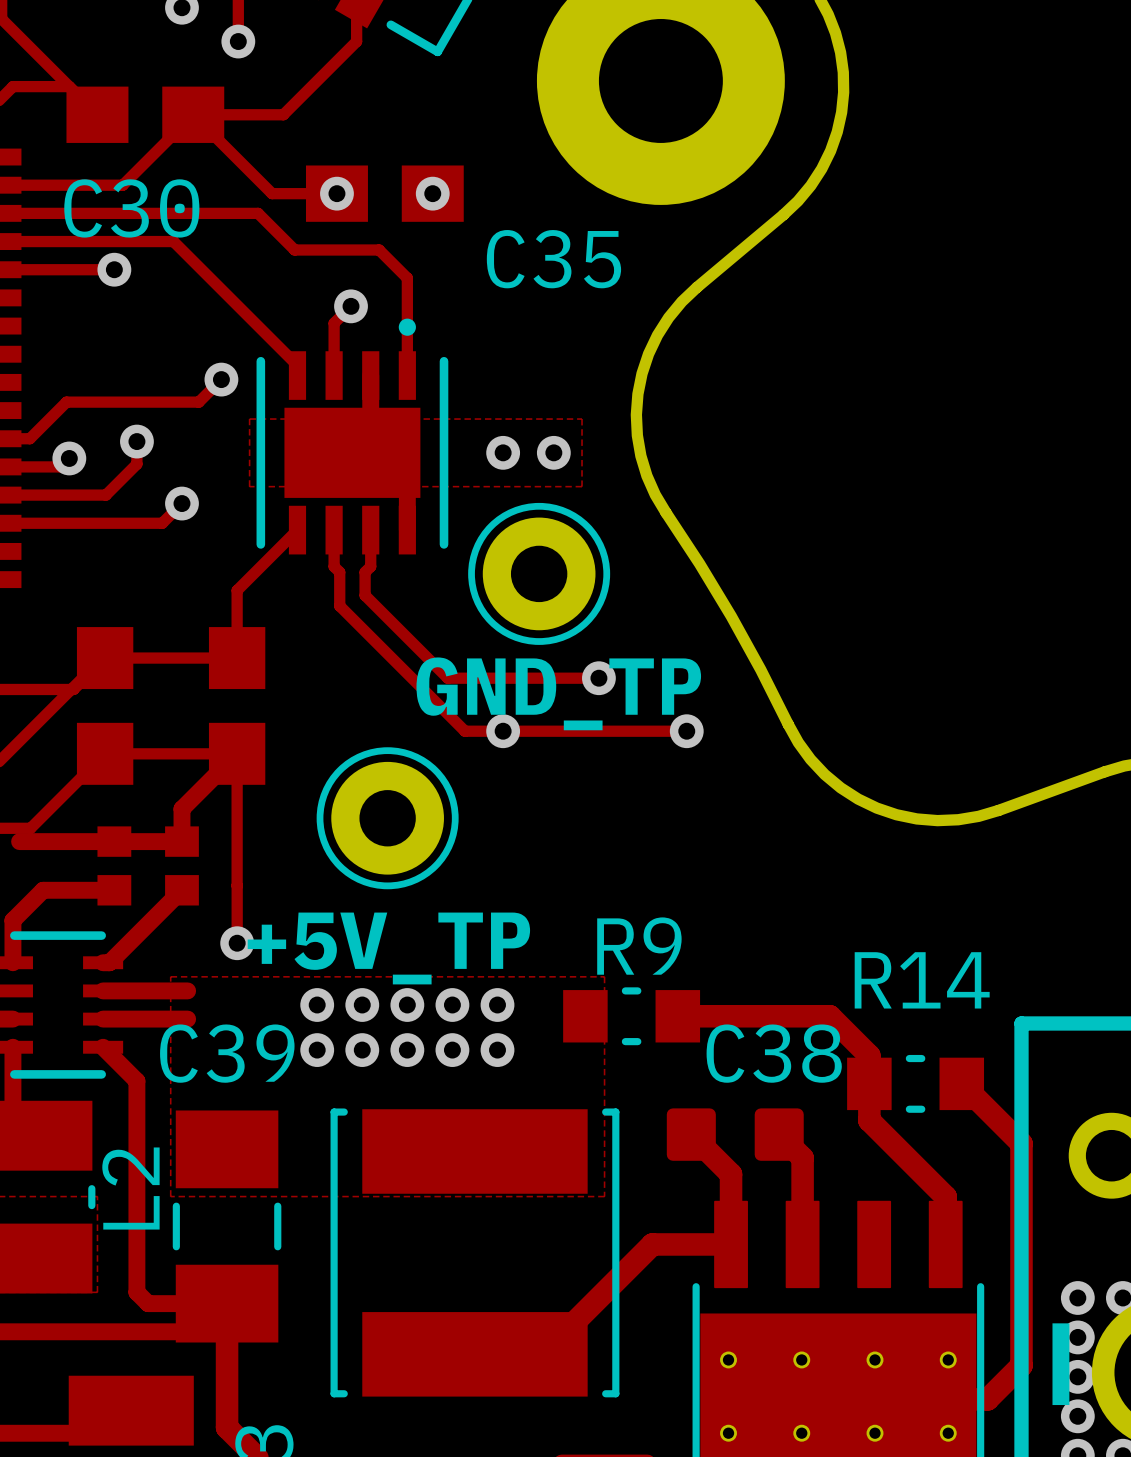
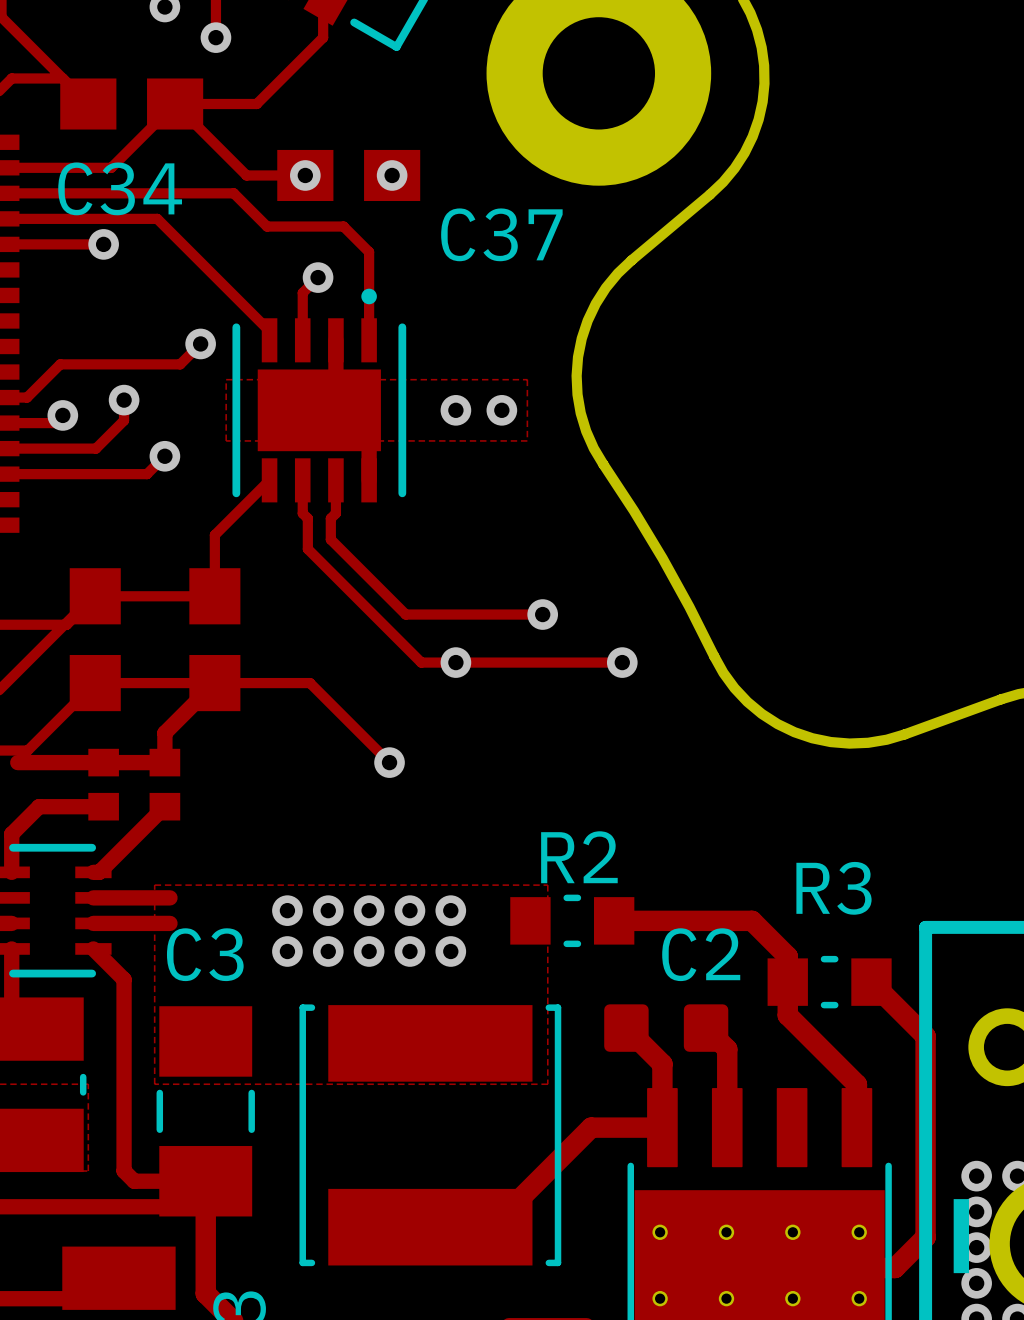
C30 name: C30 (131, 208) -> C34 (120, 188)
C35 name: C35 (553, 259) -> C37 (501, 234)
GND_TP: (539, 573) -> none
track: (237, 753) (237, 943) -> (214, 683) (310, 683) (389, 762)
+5V_TP: (387, 818) -> none
via position: (237, 943) -> (389, 762)
R9 name: R9 (639, 946) -> R2 (579, 857)
R14 name: R14 (922, 980) -> R3 (833, 888)
C39 name: C39 (227, 1053) -> C3 (205, 954)
C38 name: C38 (774, 1053) -> C2 (701, 954)
L2 name: L2 (130, 1188) -> none

